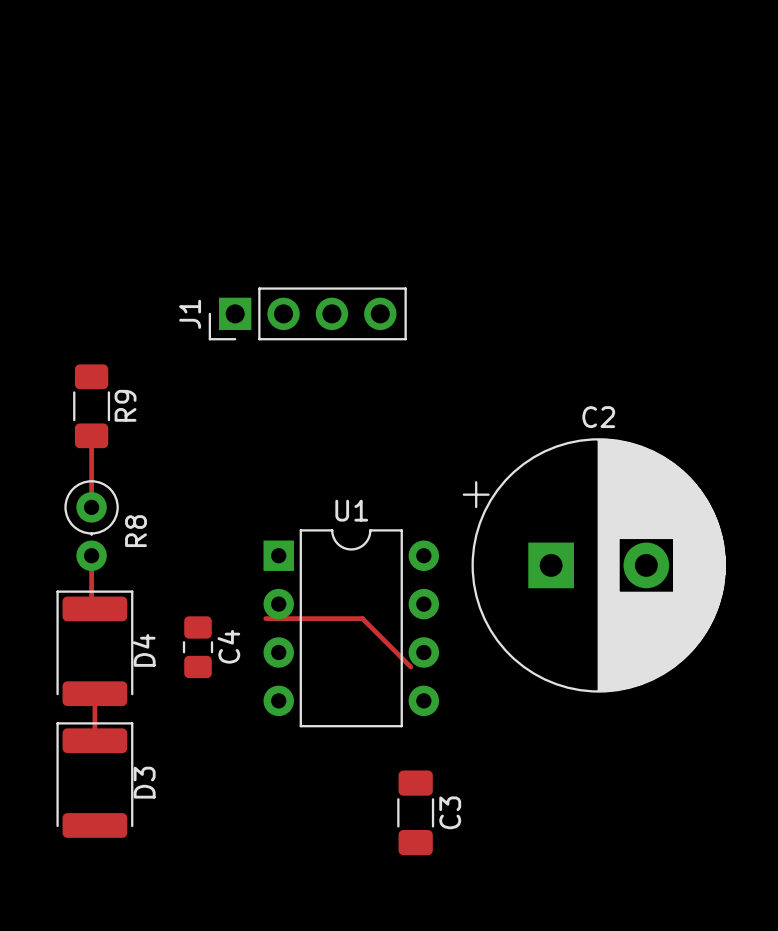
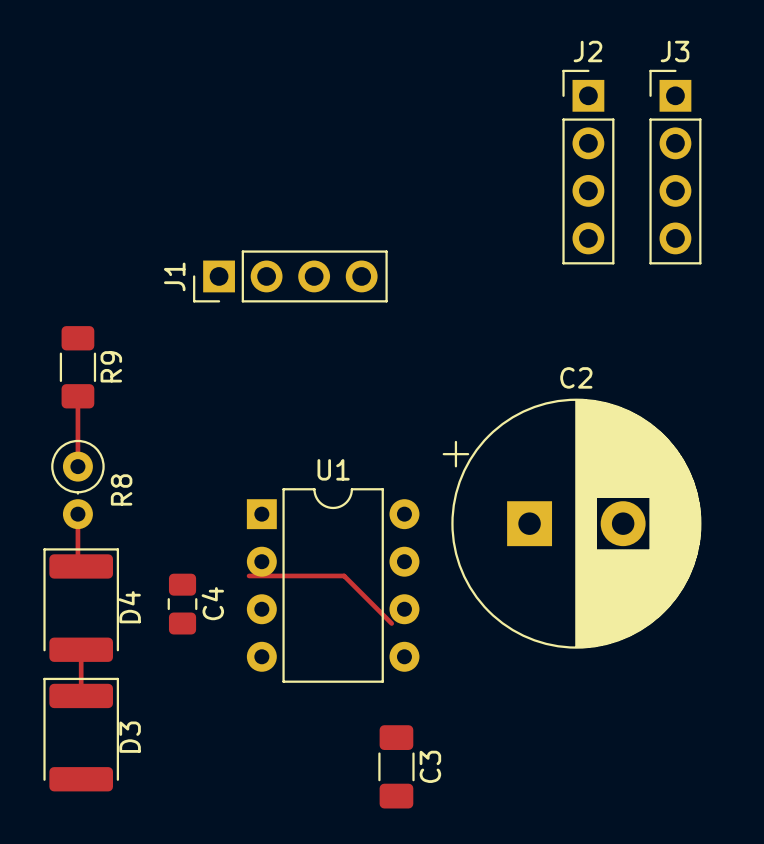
J2: none -> (588, 167)
J3: none -> (675, 167)

